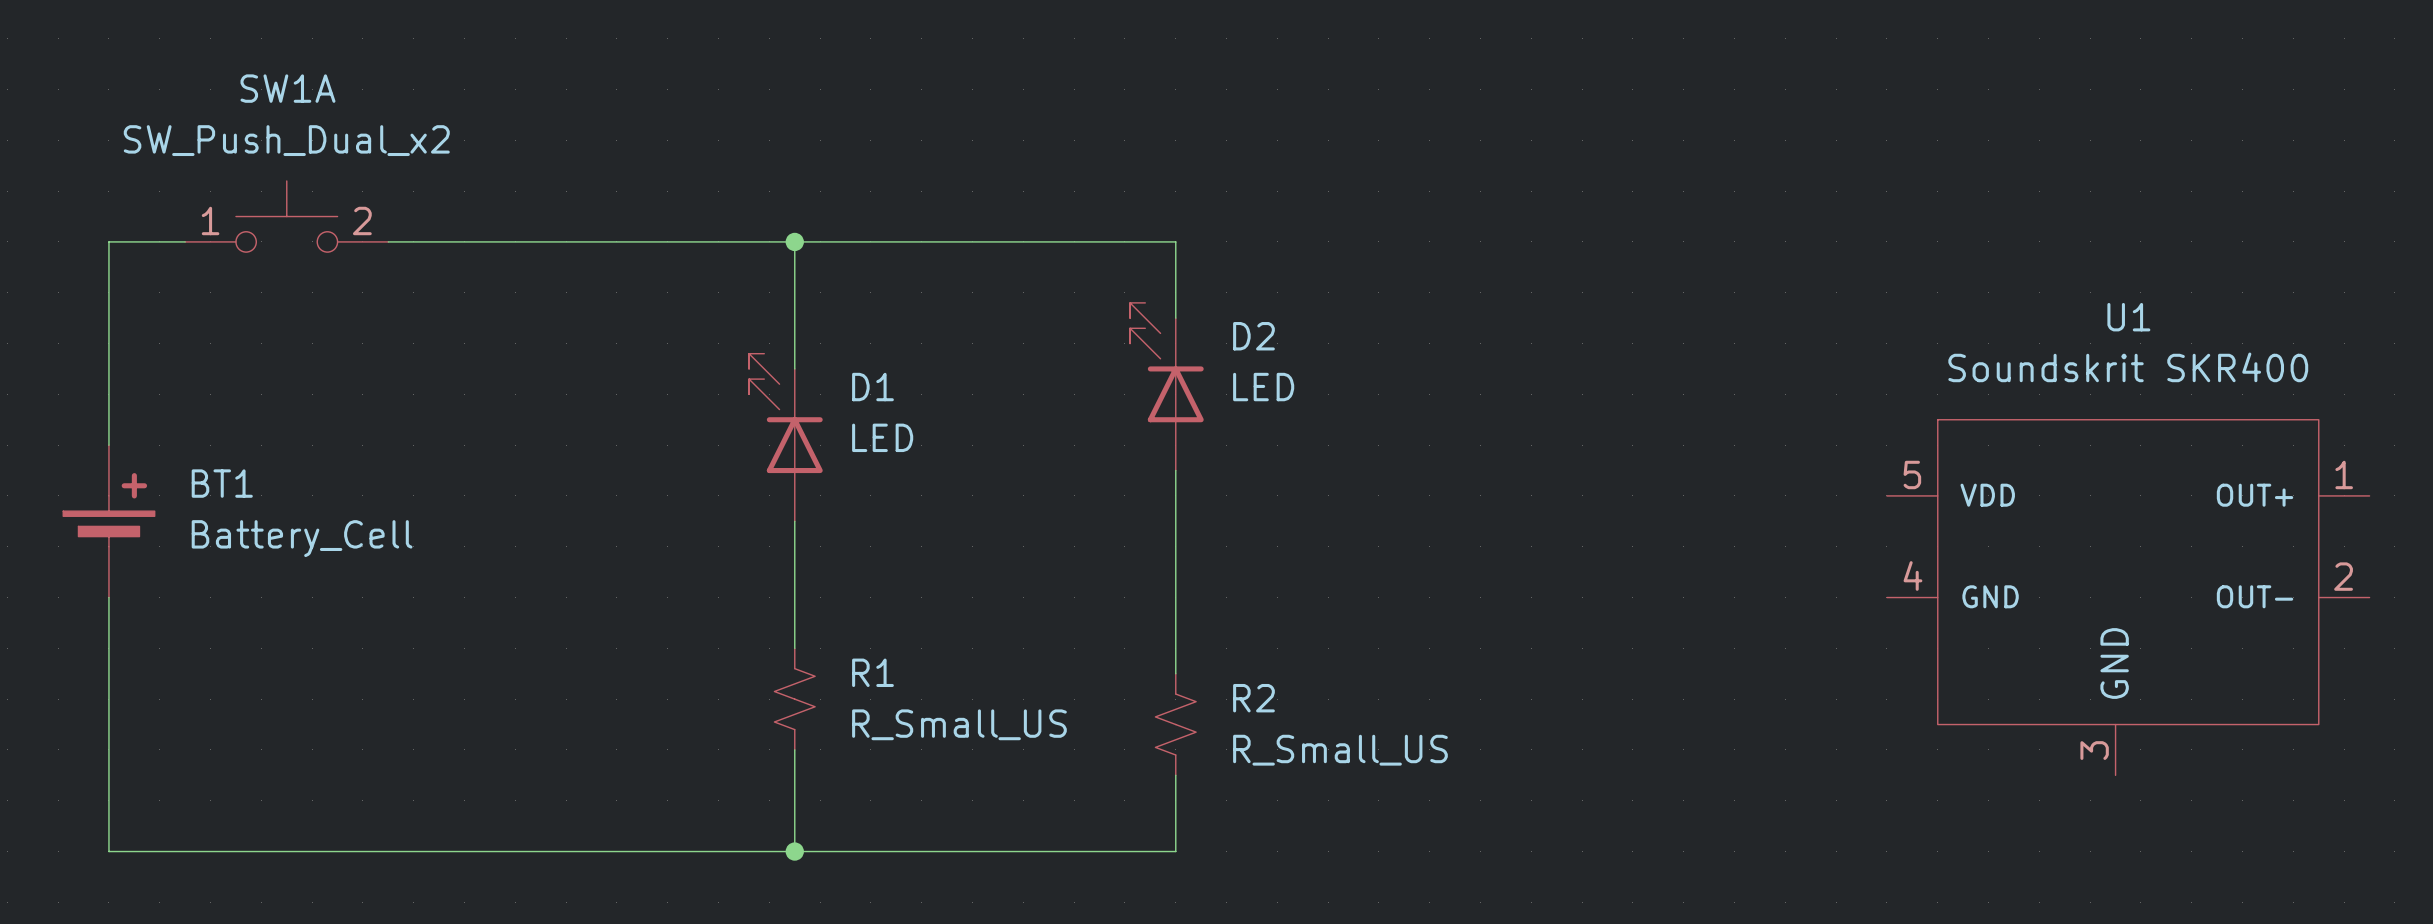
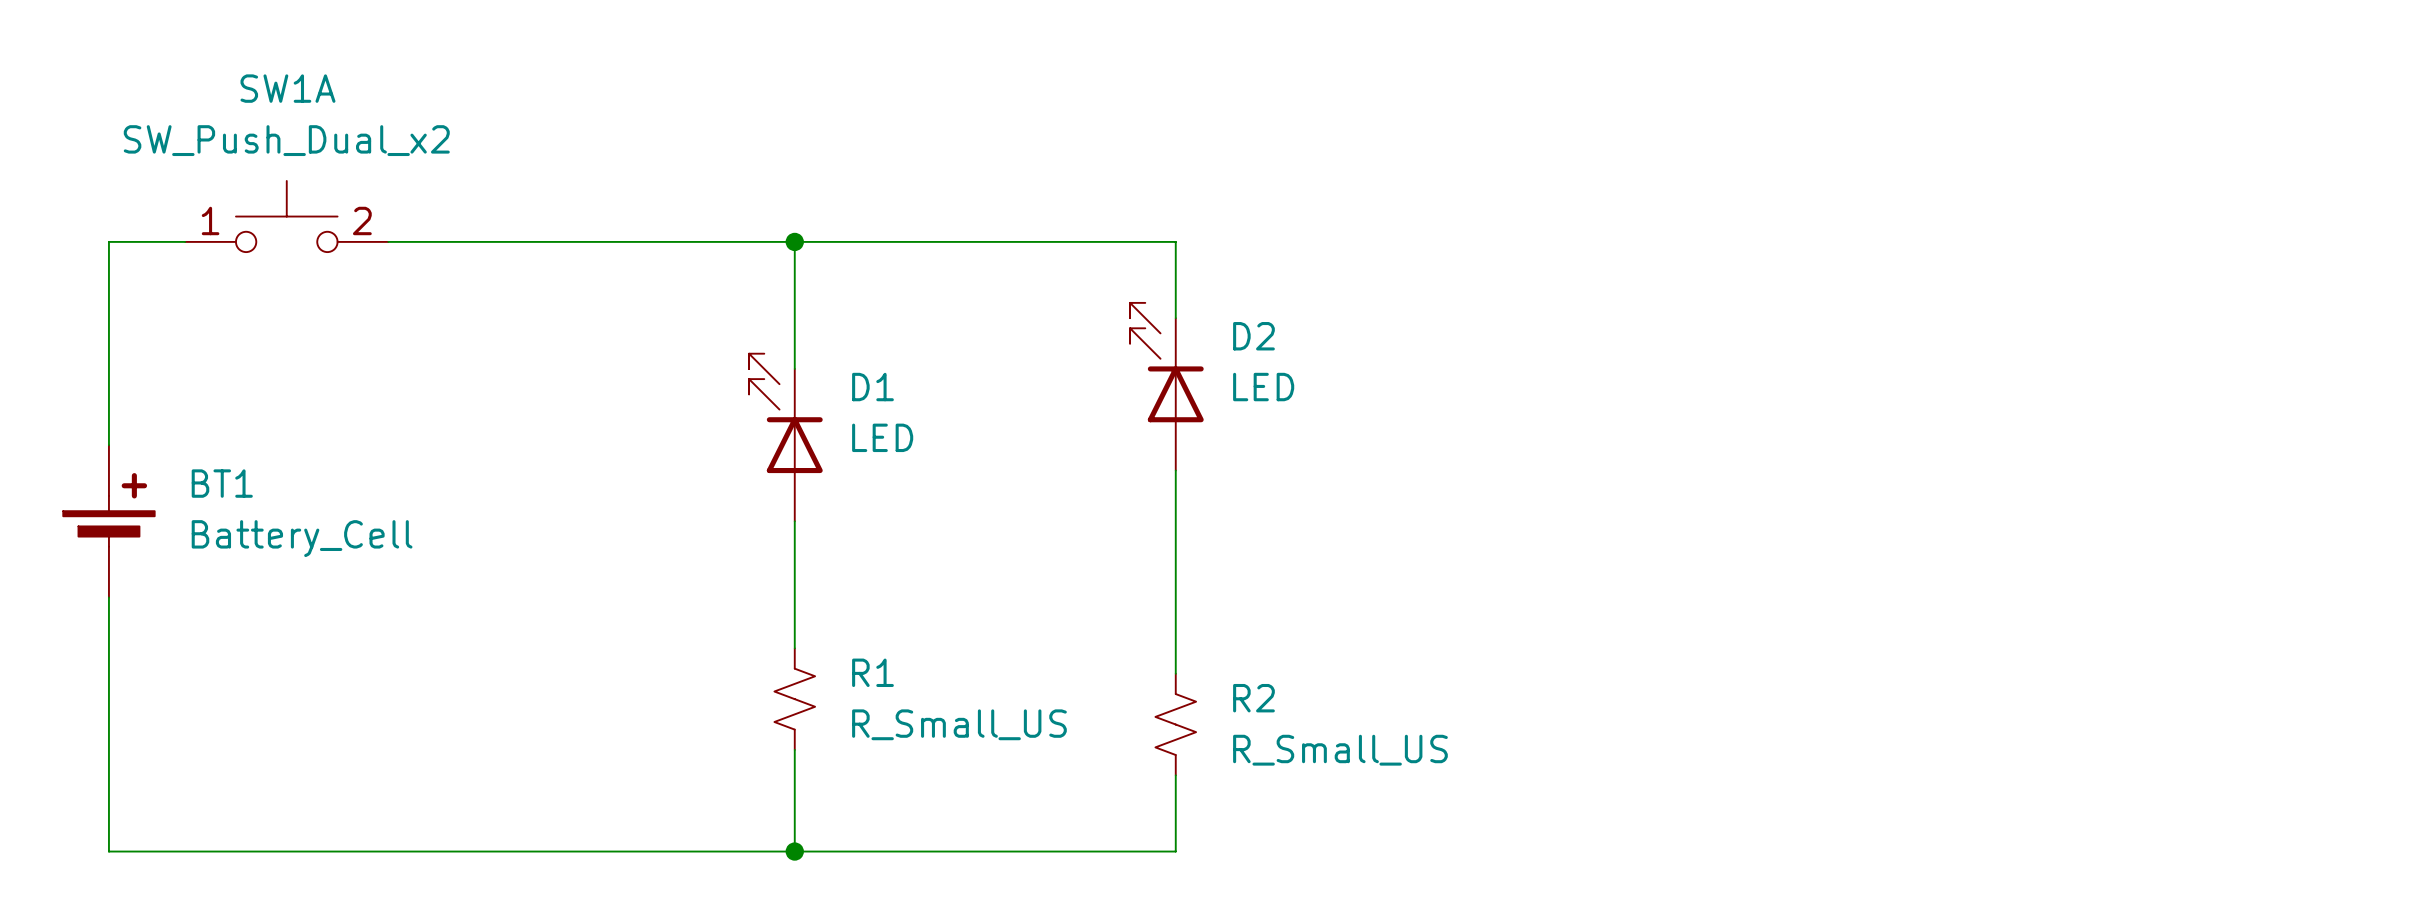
U1: Soundskrit SKR400 (2128, 597) -> none

